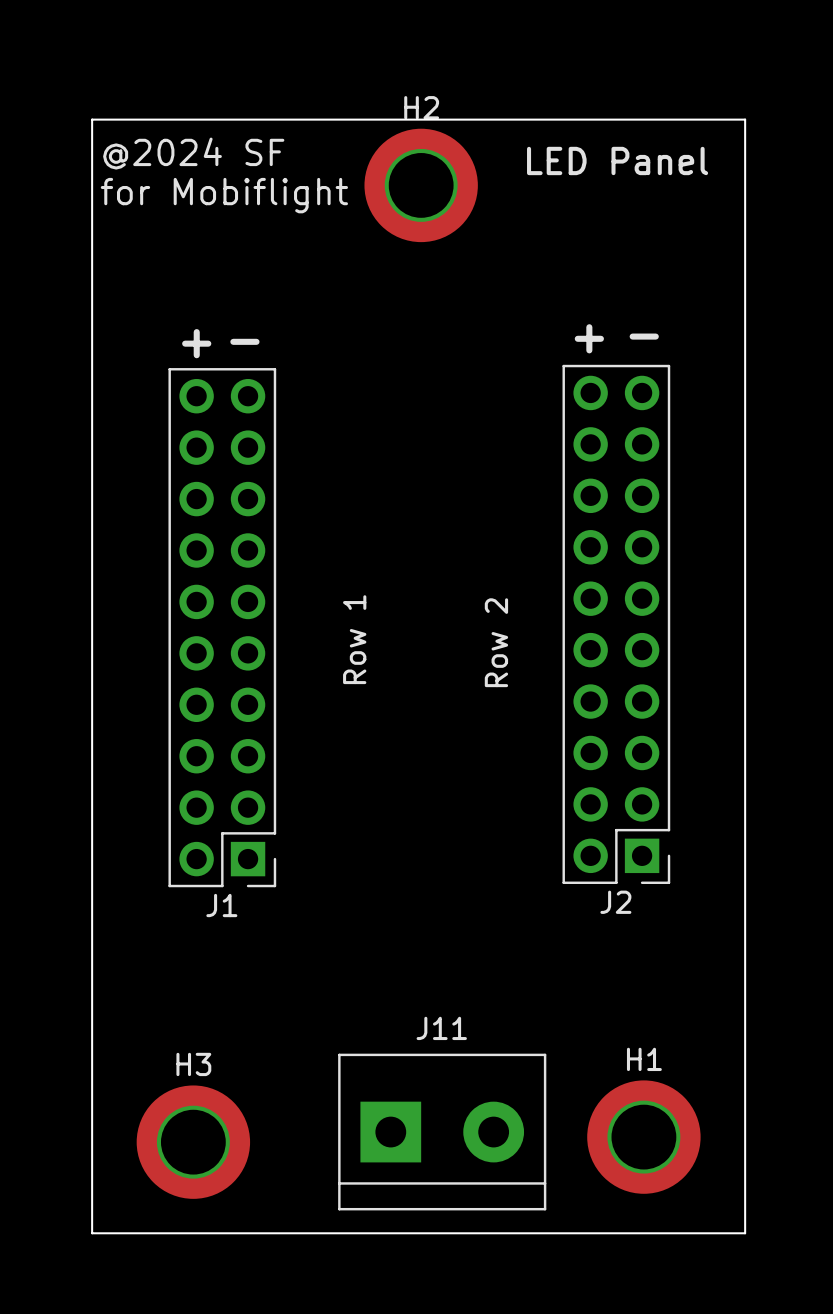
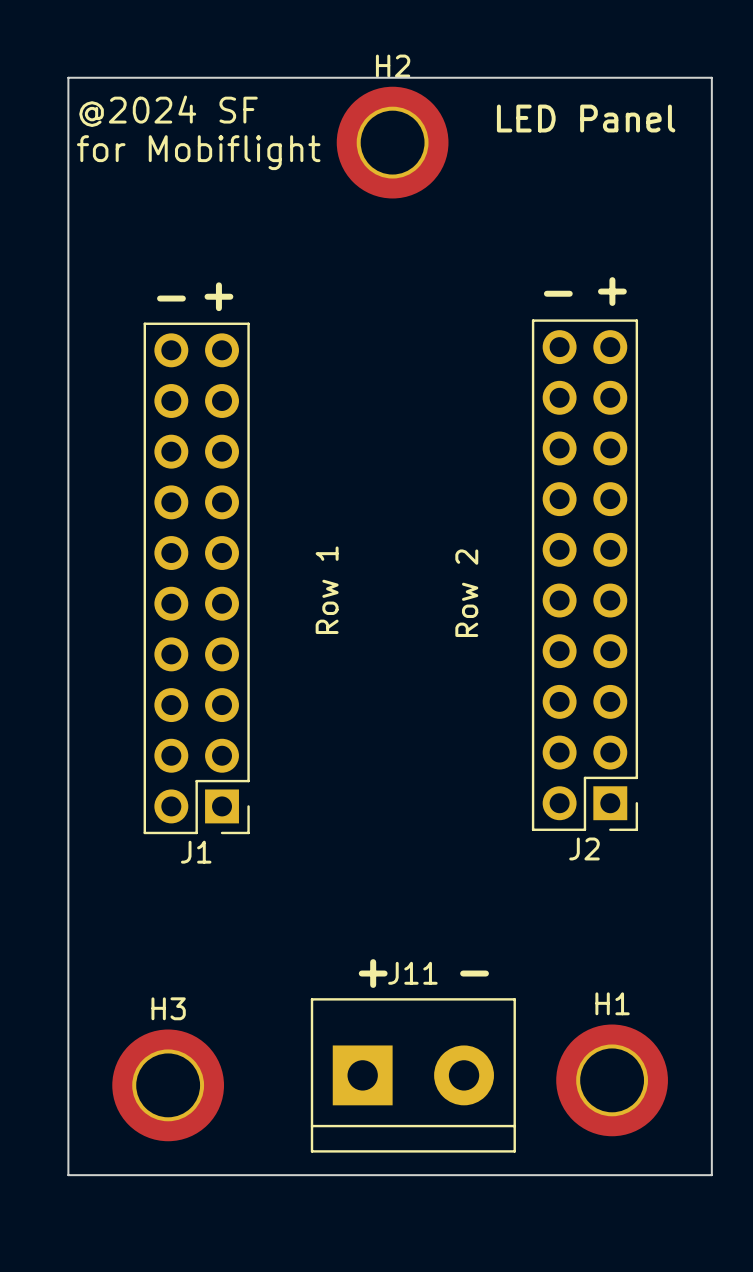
text: - (644, 336) -> + (612, 291)
text: + (589, 338) -> - (558, 293)
text: - (244, 341) -> + (218, 296)
text: + (196, 343) -> - (171, 298)
text: none -> + (373, 973)
text: none -> - (474, 973)

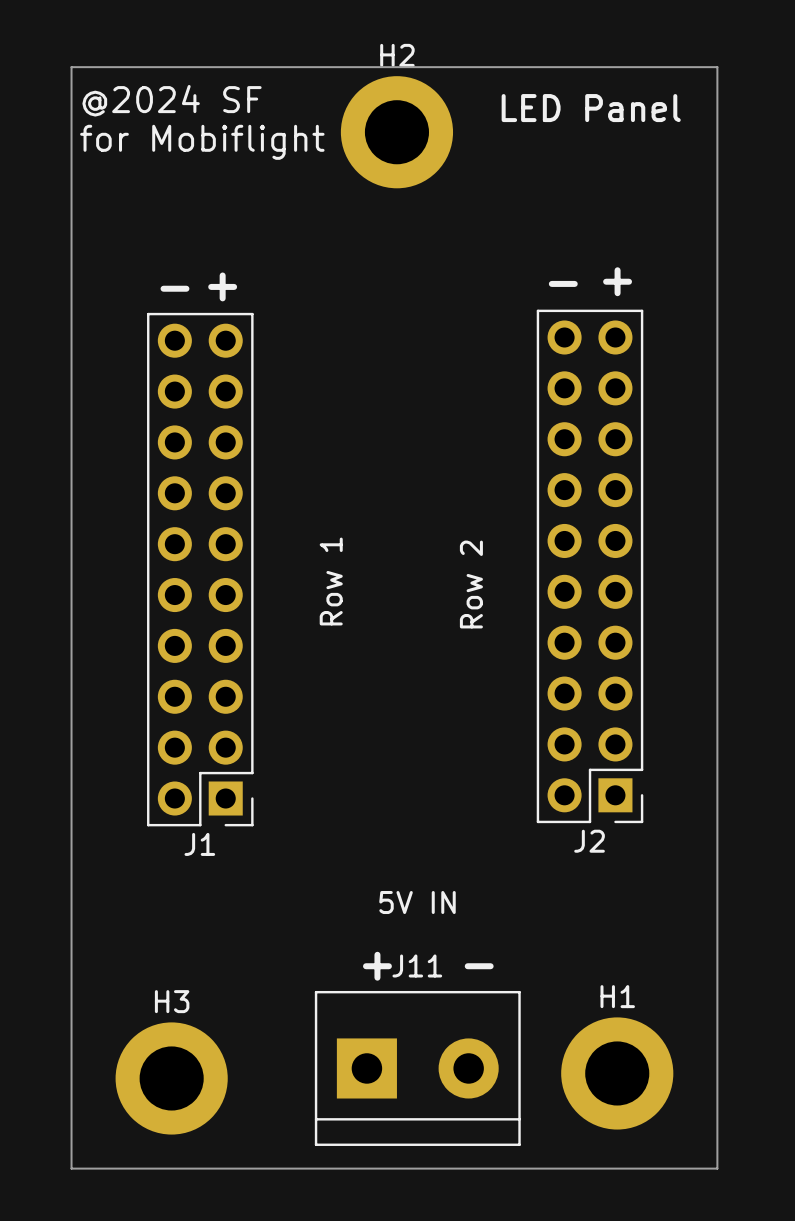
text: none -> 5V IN (417, 902)

